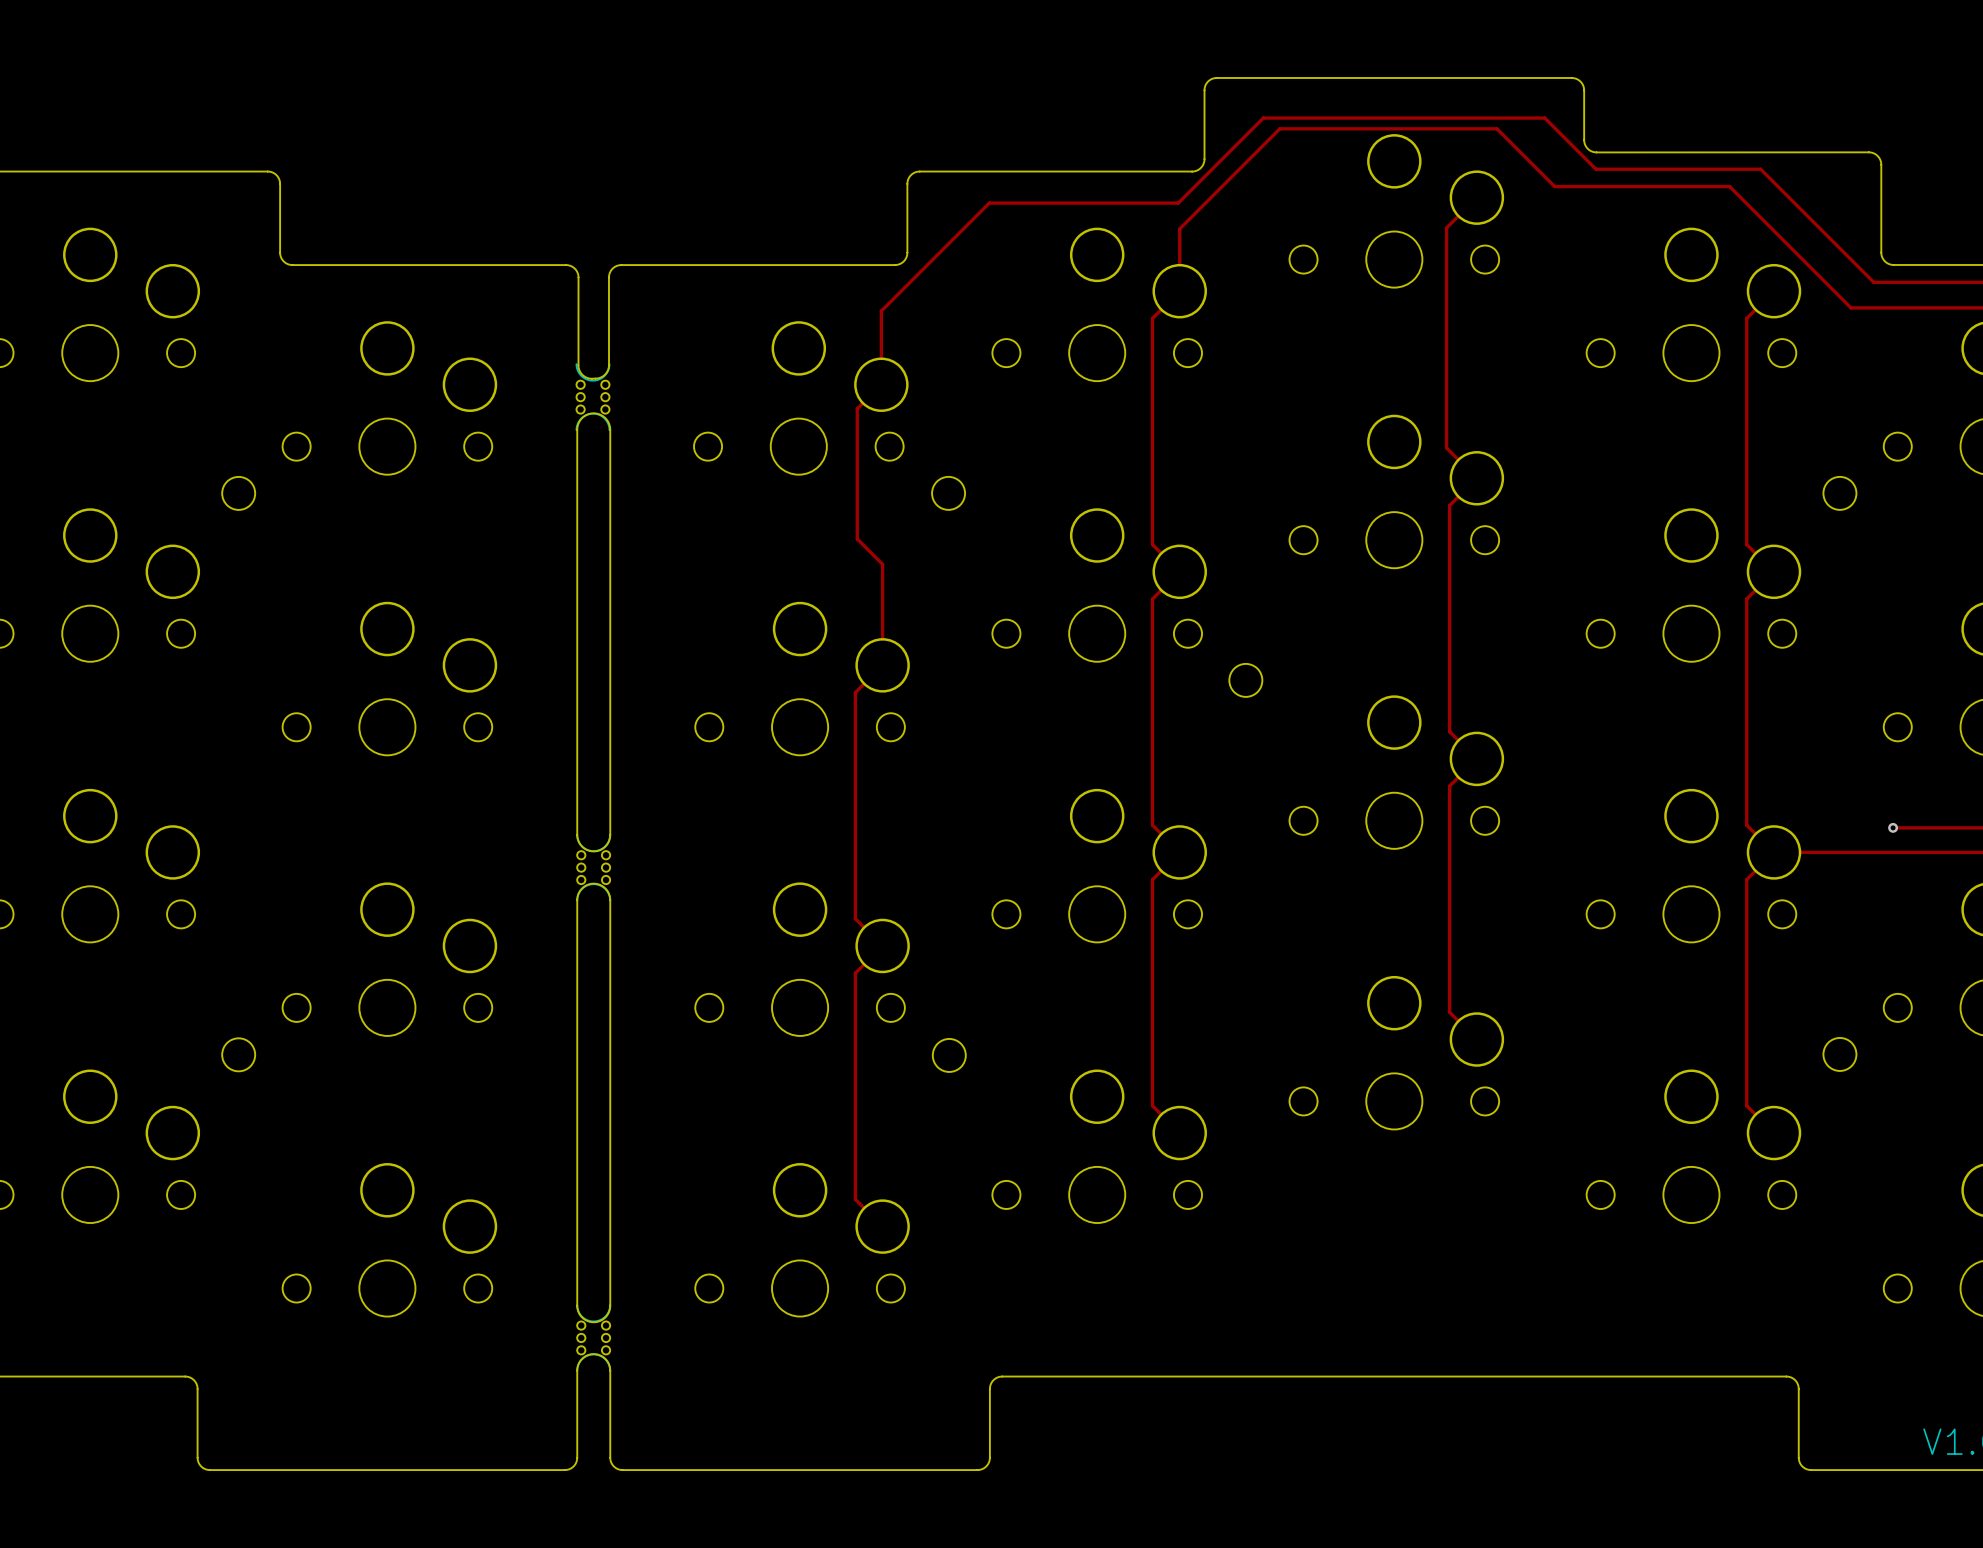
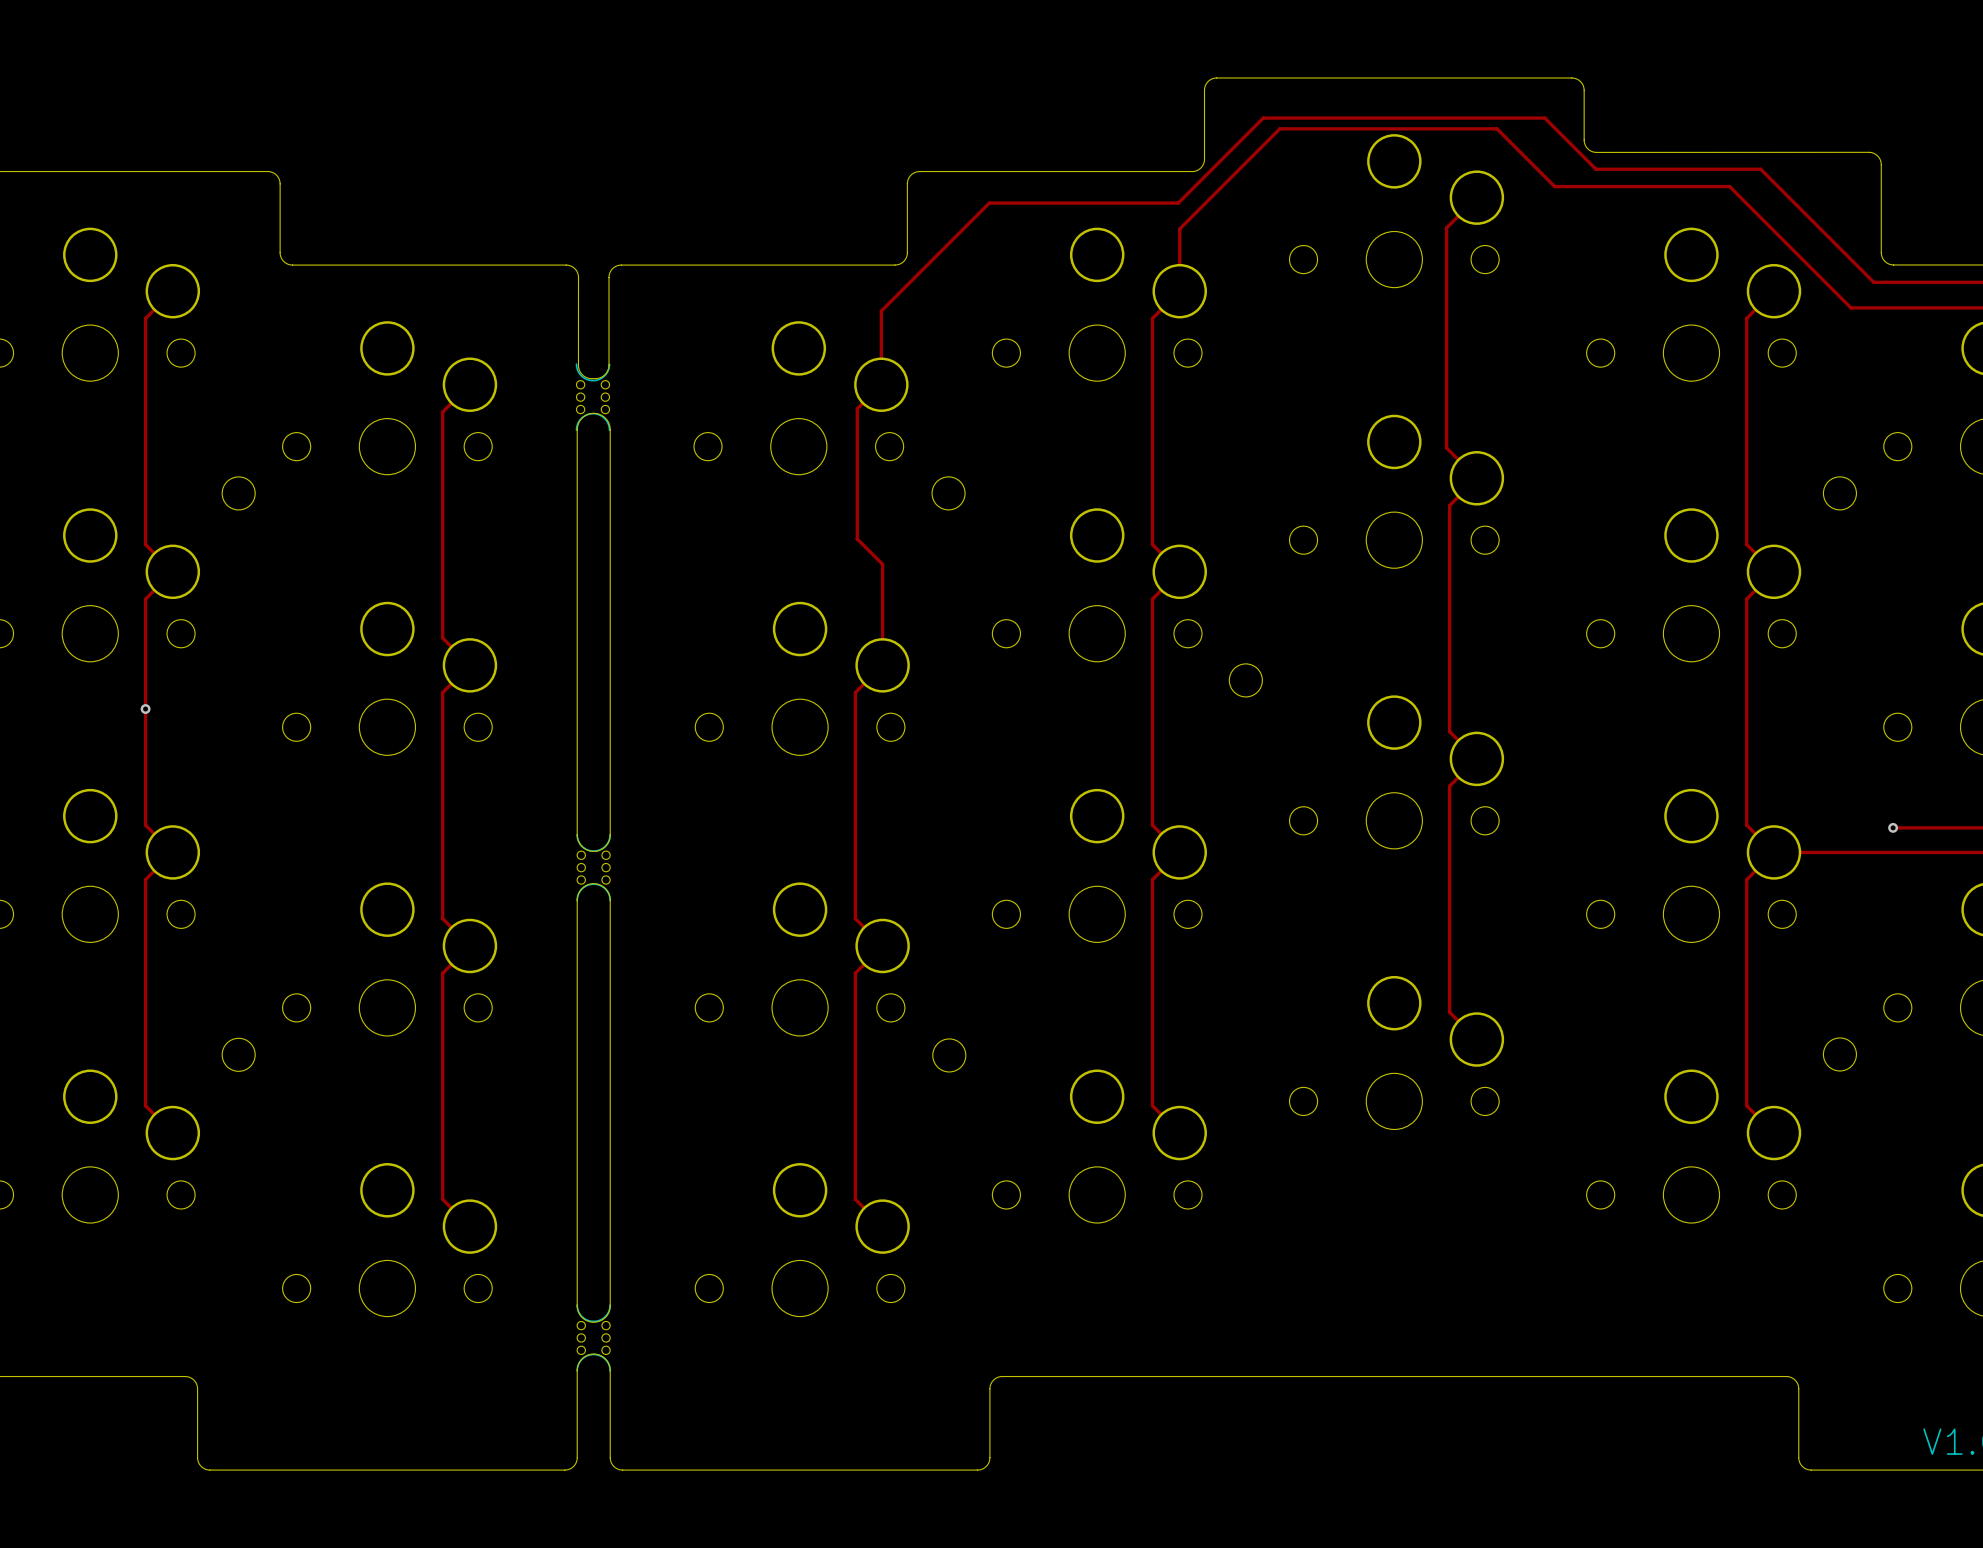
track: none -> (172, 291) (145, 318) (145, 544) (172, 571) (145, 599) (145, 825) (172, 852) (145, 879) (145, 1105) (172, 1133)
track: none -> (469, 384) (442, 411) (442, 638) (469, 665) (442, 692) (442, 918) (469, 945) (442, 973) (442, 1199) (469, 1226)
via: none -> (145, 709)

